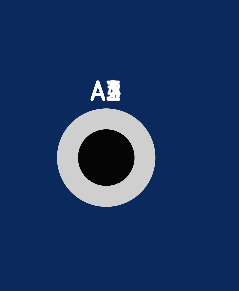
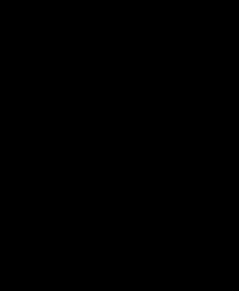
part: (106, 157) -> none
part: (106, 157) -> none
part: (106, 157) -> none
part: (106, 157) -> none

